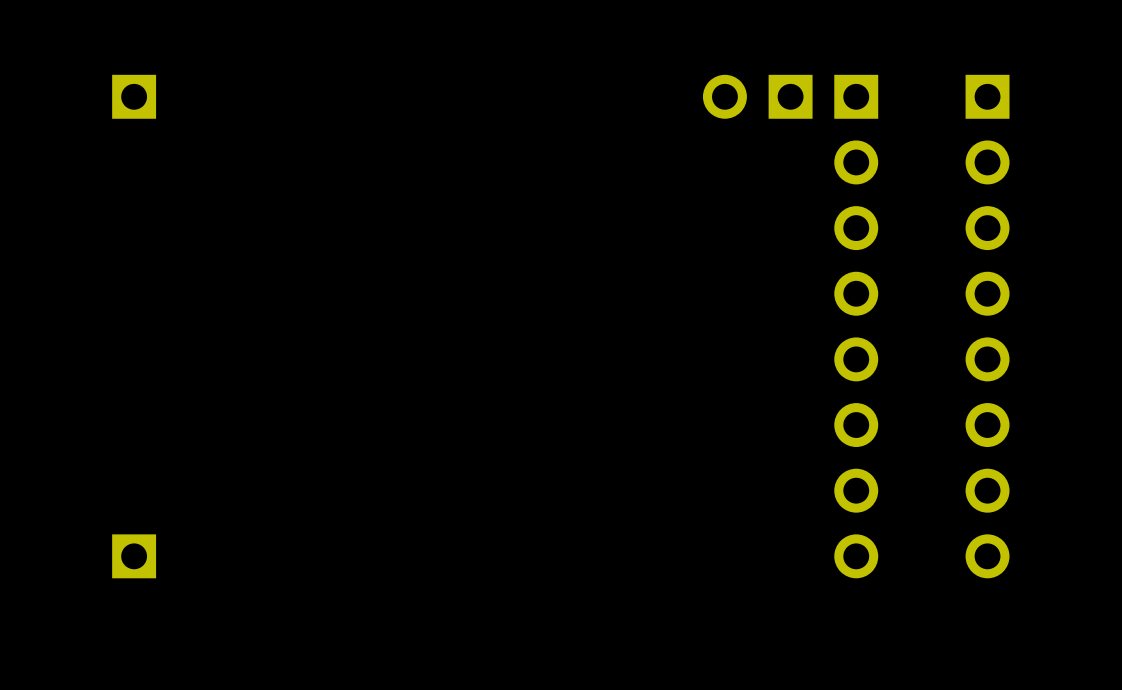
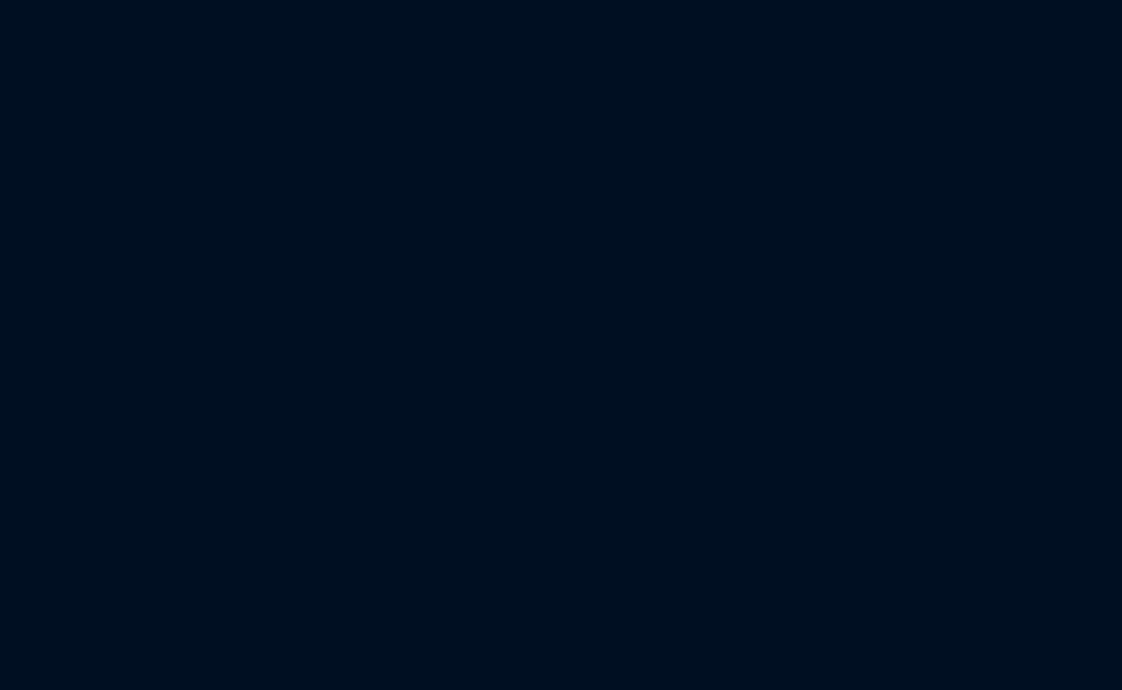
part: (134, 96) -> none
part: (757, 96) -> none
part: (856, 326) -> none
part: (987, 326) -> none
part: (134, 556) -> none

